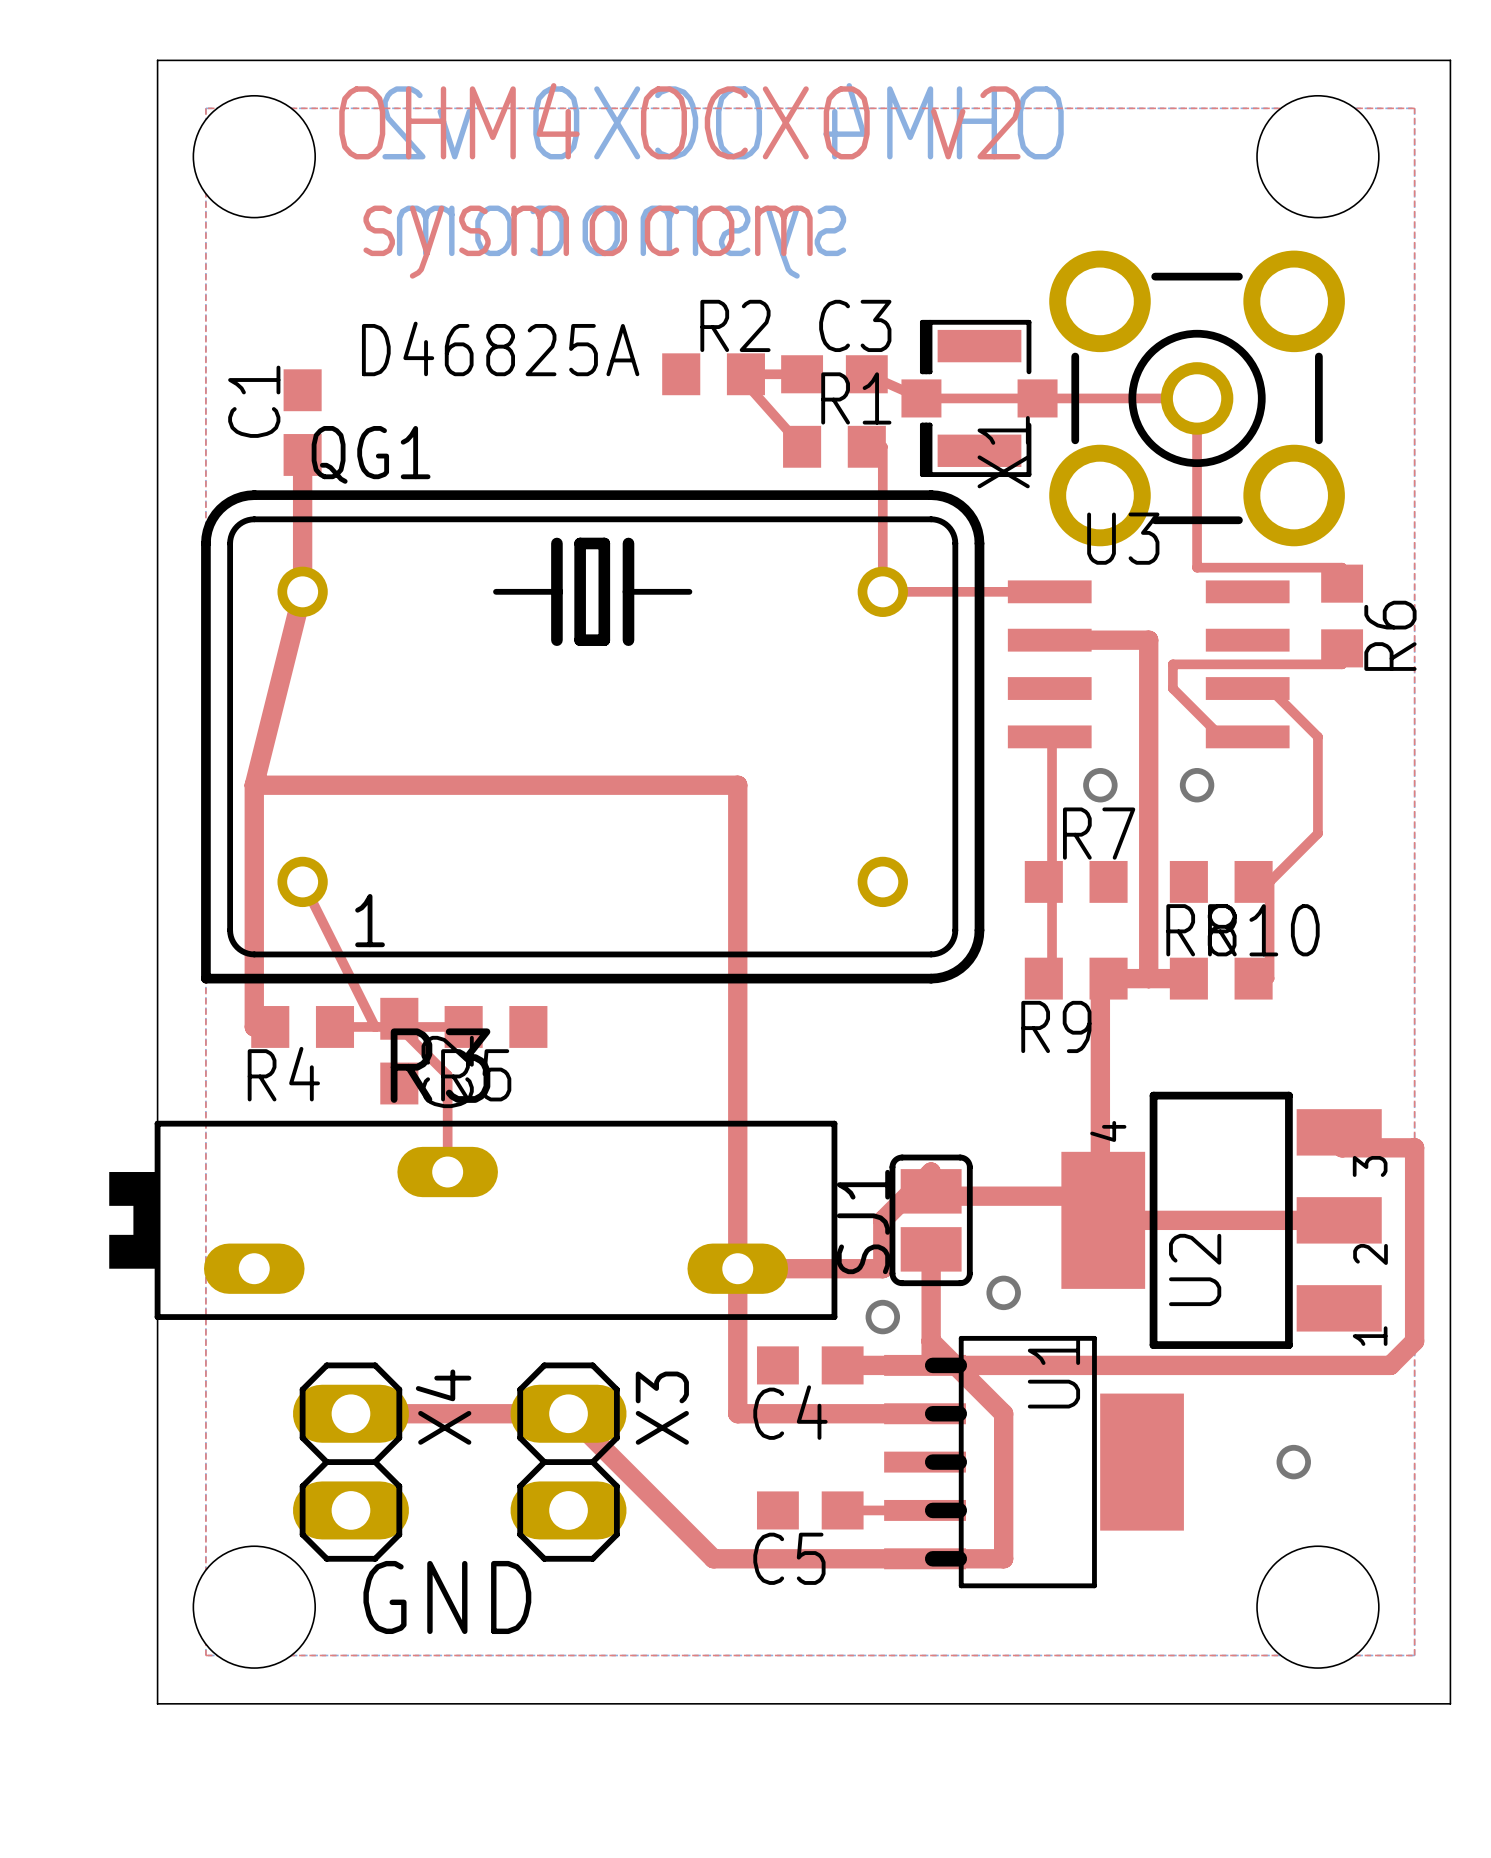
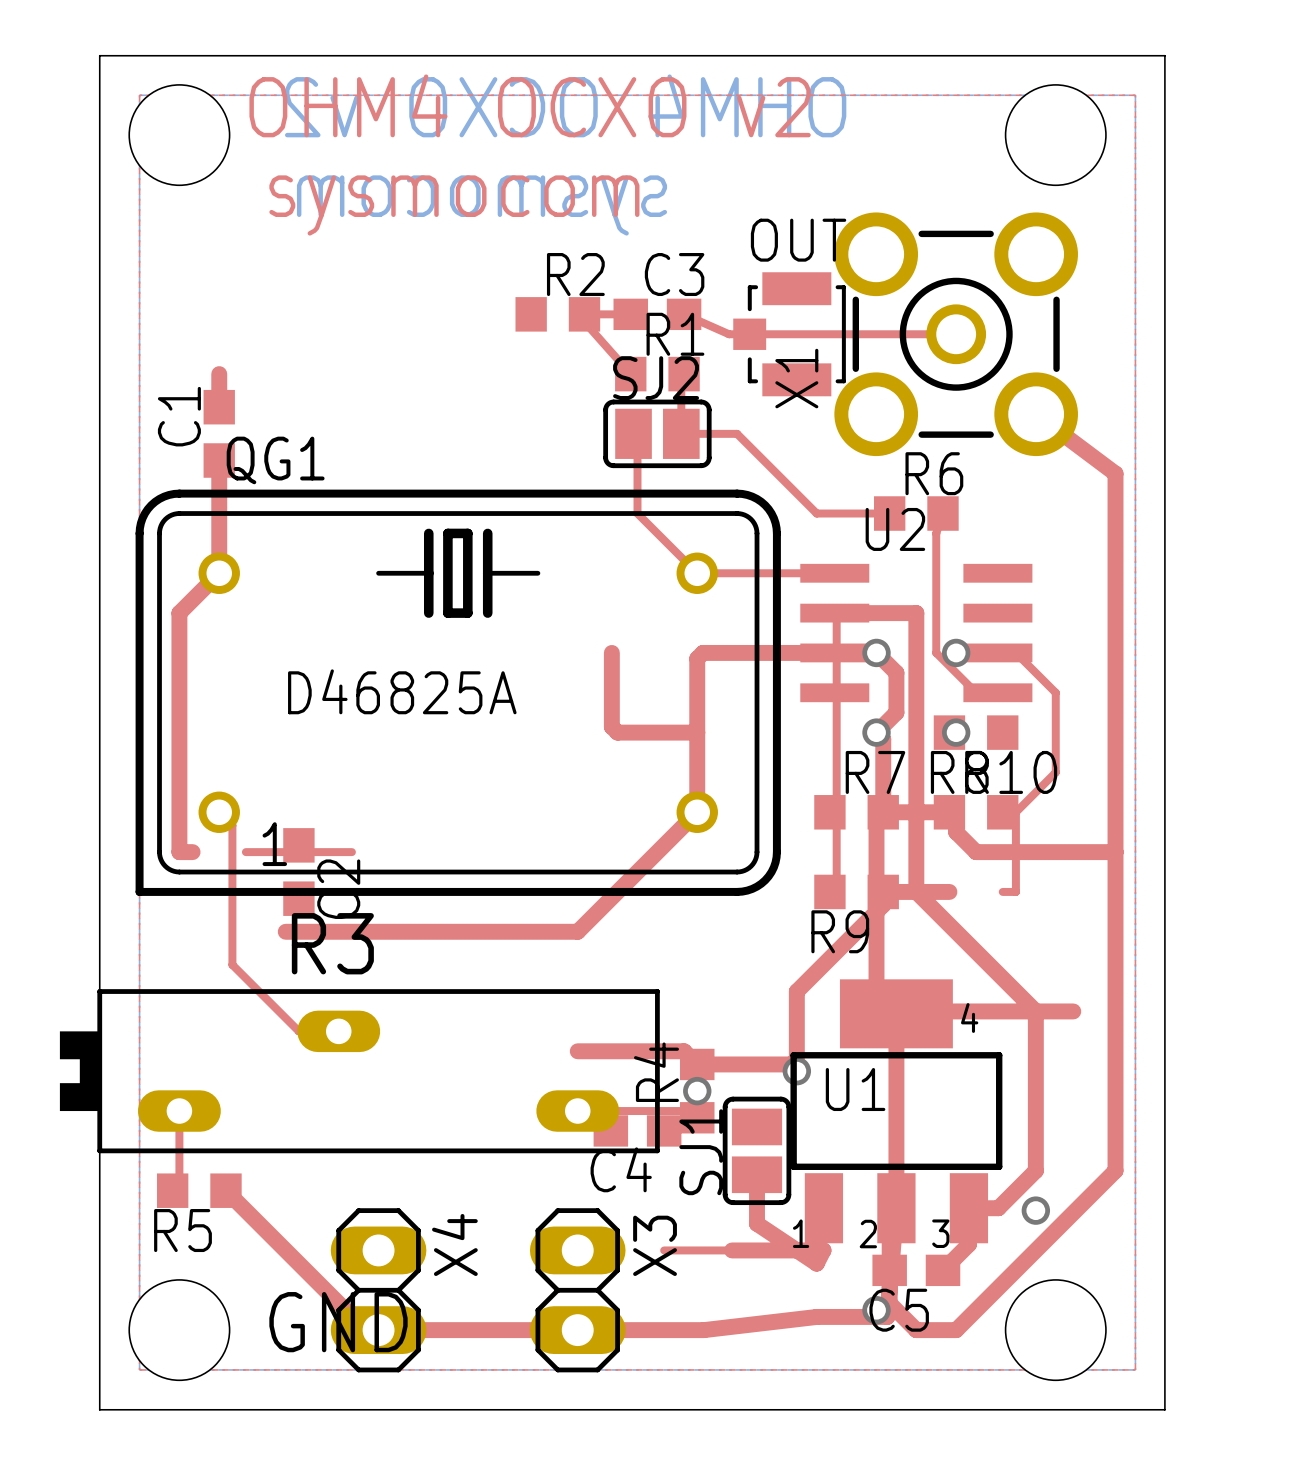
text position: D46825A (500, 348) -> D46825A (402, 691)
part: (979, 398) -> none
OUT: none -> (789, 334)
top track: (1197, 398) (1197, 567) (1342, 567) (1342, 583) -> none
C1 position: (302, 422) -> (219, 433)
top track: (866, 446) (882, 446) (882, 591) (1049, 591) -> (684, 374) (681, 376) (681, 433) (737, 433) (816, 513) (889, 513)
top track: (302, 486) (302, 543) -> none
top track: none -> (1036, 414) (1115, 473) (1115, 1170) (956, 1330) (916, 1330) (889, 1303) (889, 1221) (896, 1208)
top track: none -> (633, 433) (637, 437) (637, 513) (689, 565) (689, 573) (834, 573)
SJ2: none -> (657, 433)
top track: (302, 591) (254, 785) (737, 785) (737, 1413) (925, 1413) -> (219, 493) (219, 573) (179, 613) (179, 652)
R6 rotation: 0° (1342, 616) -> 90° clockwise (916, 513)
R6 position: (1342, 616) -> (916, 513)
R6 name position: R6 (1390, 635) -> R6 (934, 473)
top track: (1049, 640) (1148, 640) (1148, 736) -> (836, 613) (916, 613)
top track: (1342, 648) (1342, 664) (1172, 664) -> (943, 513) (936, 533) (936, 553)
U3: (1148, 664) -> none
top track: (1172, 688) (1221, 736) (1247, 736) -> (936, 573) (936, 652) (976, 692) (997, 692)
top track: (1247, 688) (1269, 688) (1317, 736) (1317, 833) (1269, 881) -> none
QG1 position: (592, 736) -> (458, 692)
top track: none -> (611, 652) (611, 726) (617, 732) (697, 732)
top track: none -> (997, 652) (1015, 652) (1055, 692) (1055, 772) (1015, 812) (1015, 891) (1002, 891)
top track: (302, 881) (375, 1026) -> none
R7: (1076, 881) -> none
via: none -> (876, 732)
via: none -> (956, 732)
top track: (1269, 881) (1269, 978) -> none
top track: none -> (219, 812) (232, 825) (232, 964) (298, 1031) (338, 1031)
top track: none -> (836, 812) (836, 891) (829, 891)
top track: none -> (883, 812) (883, 739) (876, 732) (896, 712) (896, 672) (876, 652) (702, 652) (697, 658) (697, 812) (577, 931) (285, 931)
top track: none -> (916, 812) (916, 891) (1035, 1011) (1035, 1170) (998, 1208) (968, 1208) (968, 1244) (943, 1270)
top track: none -> (956, 812) (956, 832) (976, 852) (1115, 852)
top track: (399, 1018) (399, 1026) (447, 1075) (447, 1172) -> none
R4 rotation: 0° (302, 1026) -> 90° clockwise (697, 1091)
R4 position: (302, 1026) -> (697, 1091)
R5 position: (496, 1026) -> (199, 1190)
R9 name: R9 (1056, 1026) -> R7 (875, 772)
R9: none -> (856, 891)
U2 footprint: [1061, 1091, 1382, 1349] -> [800, 563, 1033, 703]
top track: (1339, 1132) (1342, 1147) (1414, 1147) (1414, 1341) (1390, 1365) (842, 1365) -> none
R3 position: (473, 1220) -> (359, 1071)
SJ1 position: (931, 1220) -> (757, 1150)
top track: (1103, 1220) (1100, 1196) (931, 1196) (931, 1172) (882, 1220) (882, 1268) (866, 1268) -> (949, 891) (883, 891) (883, 905) (796, 991) (796, 1071) (790, 1064) (697, 1064) (684, 1051)
top track: none -> (896, 1013) (896, 1208)
top track: (931, 1249) (931, 1365) -> none
U2 name position: U2 (1195, 1269) -> U2 (895, 529)
U1 footprint: [884, 1335, 1184, 1589] -> [790, 979, 1003, 1244]
top track: none -> (179, 1111) (179, 1183) (172, 1190)
top track: none -> (577, 1111) (690, 1111) (697, 1117)
top track: (931, 1341) (1003, 1413) (1003, 1558) (713, 1558) (568, 1413) (350, 1413) -> none
U1 name position: U1 (1053, 1372) -> U1 (855, 1089)
top track: none -> (757, 1174) (757, 1223) (816, 1263) (823, 1250) (732, 1250)
top track: none -> (225, 1190) (365, 1330) (703, 1330) (816, 1316) (887, 1316) (896, 1208)
X4 position: (350, 1462) -> (378, 1290)
X3 position: (568, 1462) -> (577, 1290)
C5 position: (810, 1510) -> (916, 1270)
via: none -> (876, 1310)

